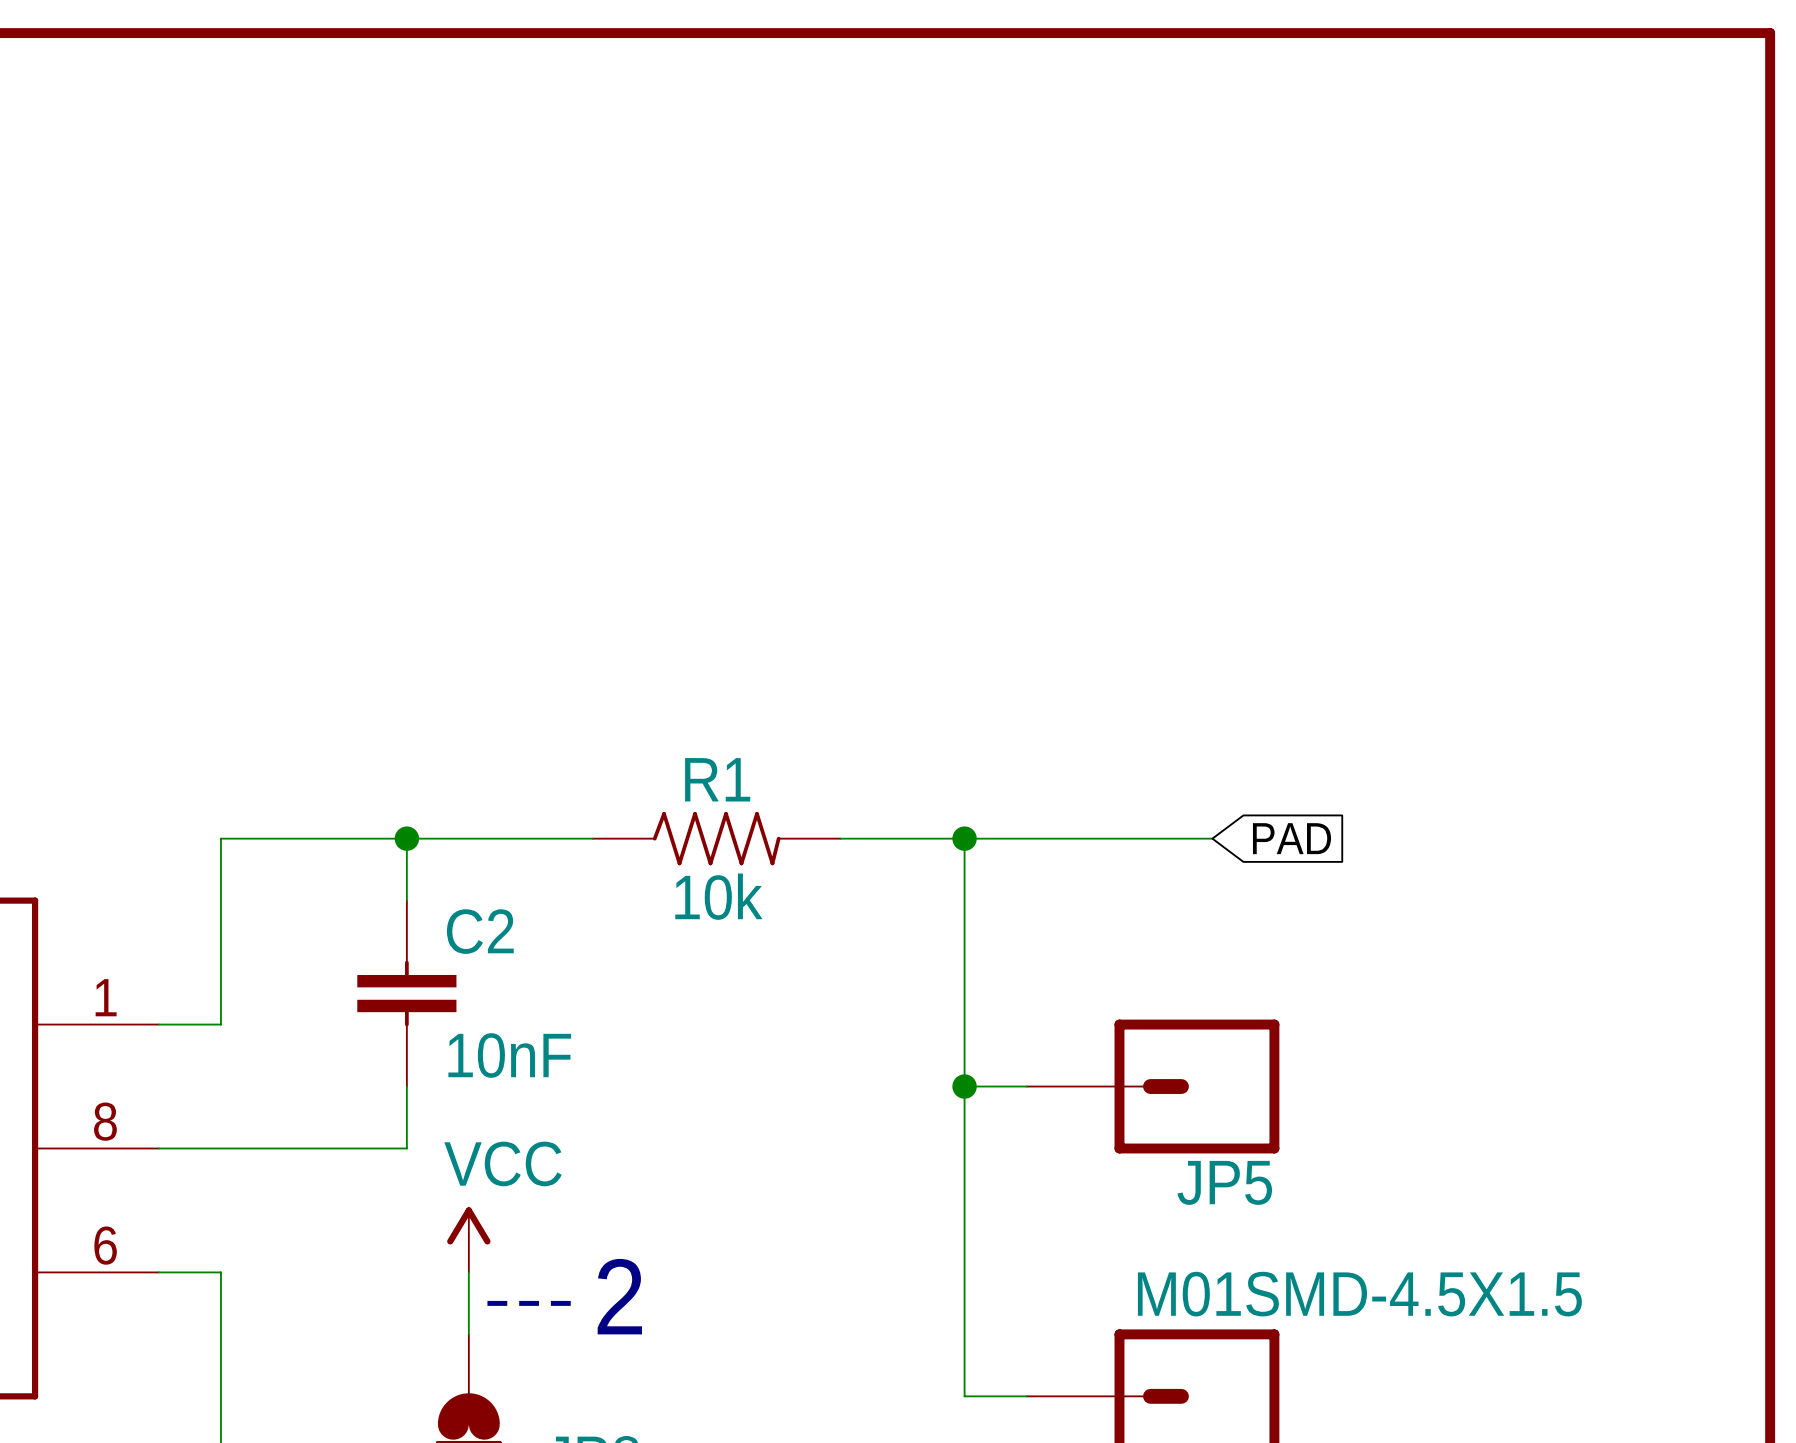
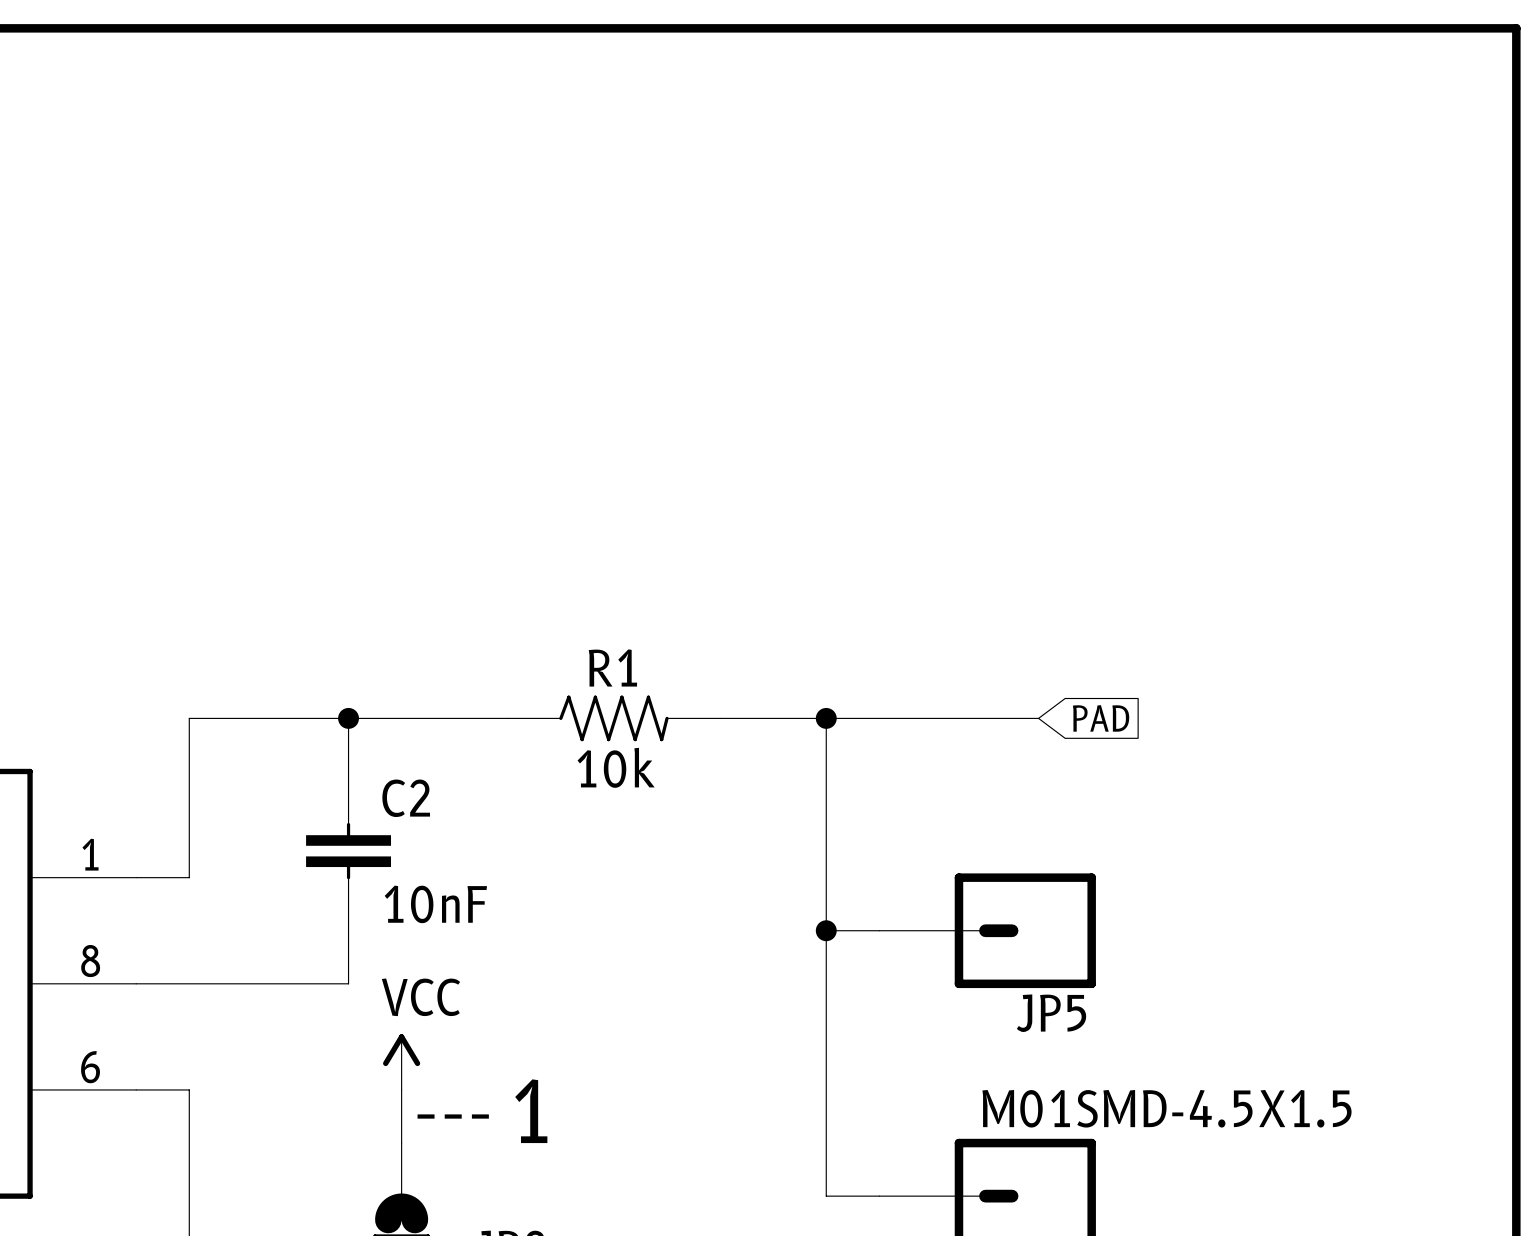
text: 2 (619, 1296) -> 1 (531, 1111)

